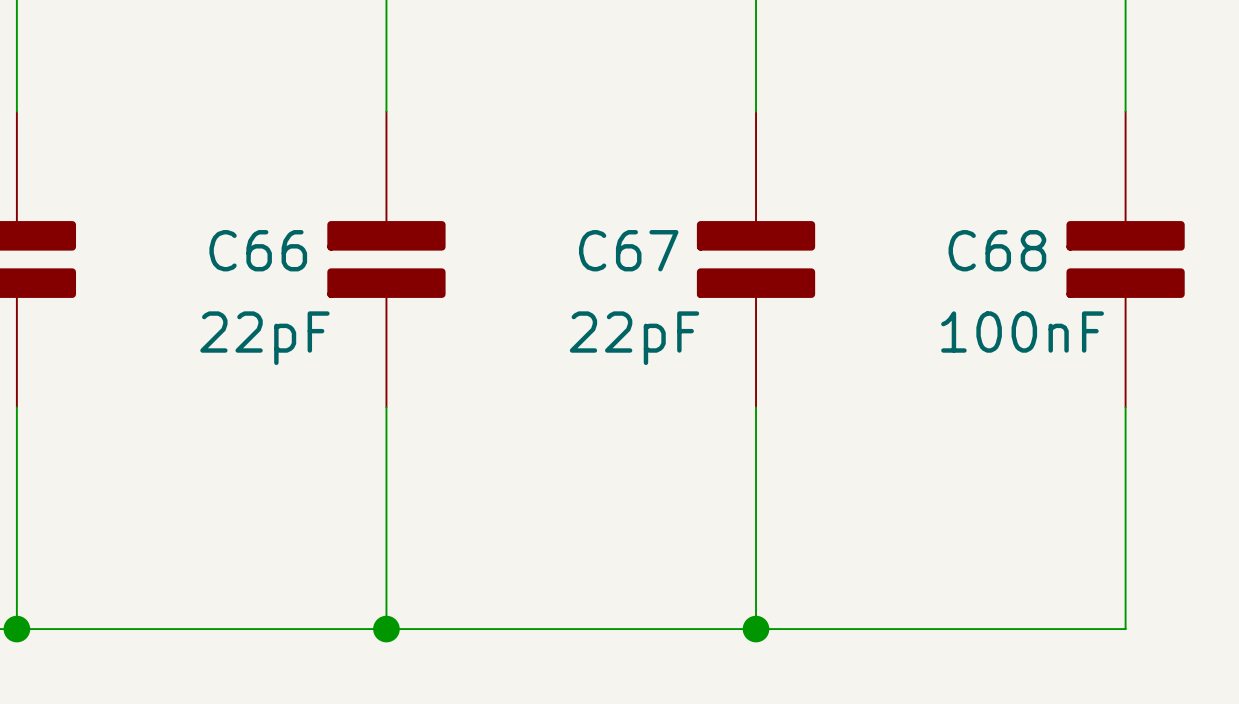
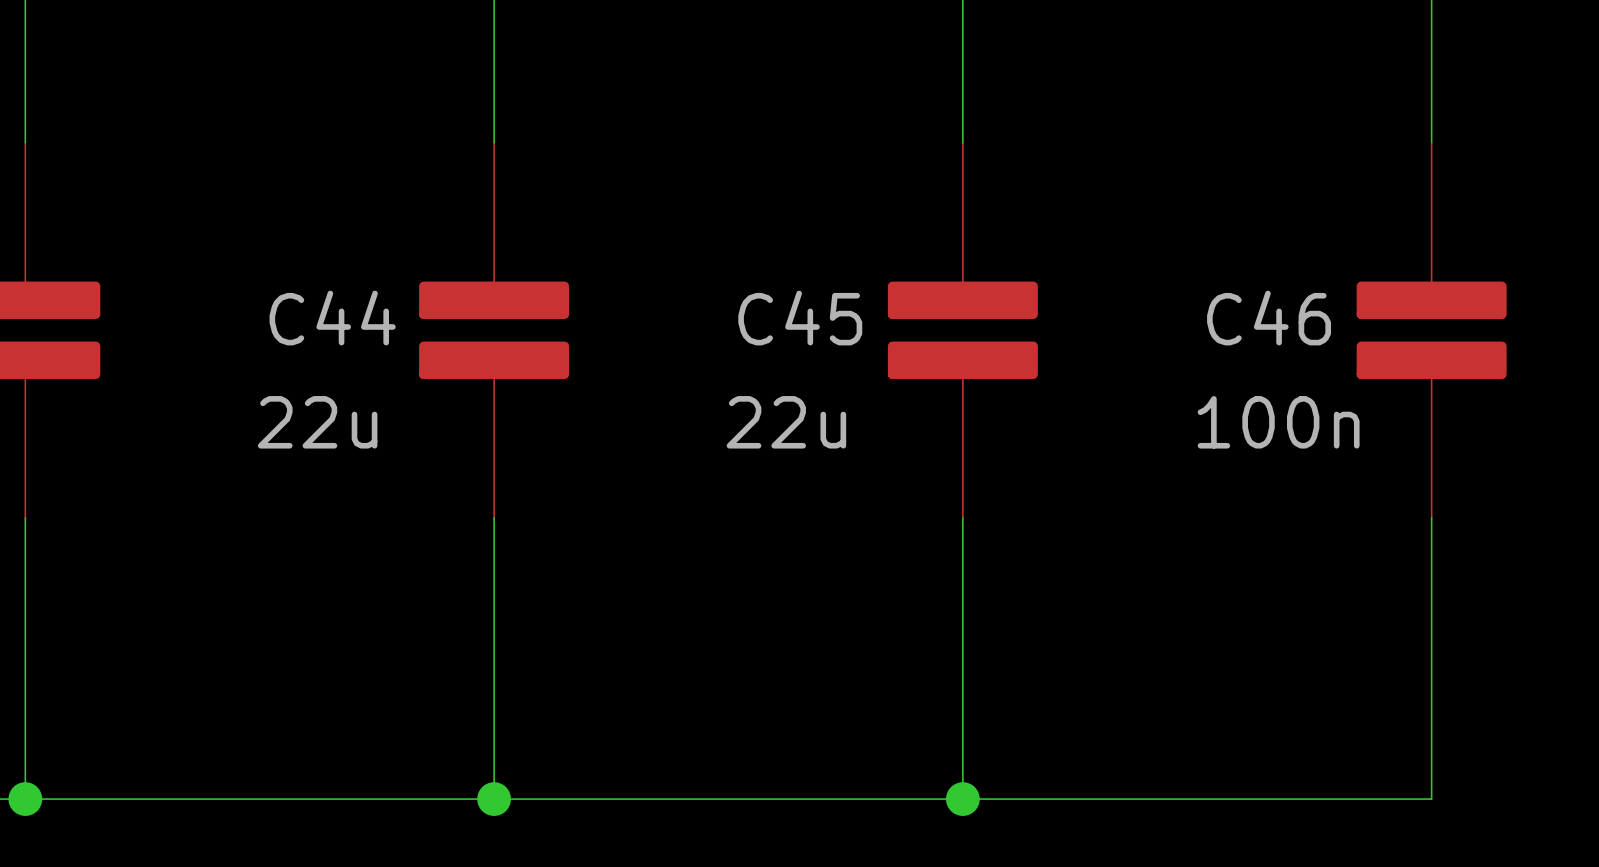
C66 name: C66 (258, 250) -> C44 (332, 318)
C67 name: C67 (628, 250) -> C45 (800, 318)
C68 name: C68 (997, 250) -> C46 (1269, 318)
C68 value: 100nF (1022, 332) -> 100n (1278, 422)
C66 value: 22pF (264, 338) -> 22u (317, 422)
C67 value: 22pF (634, 338) -> 22u (786, 422)

